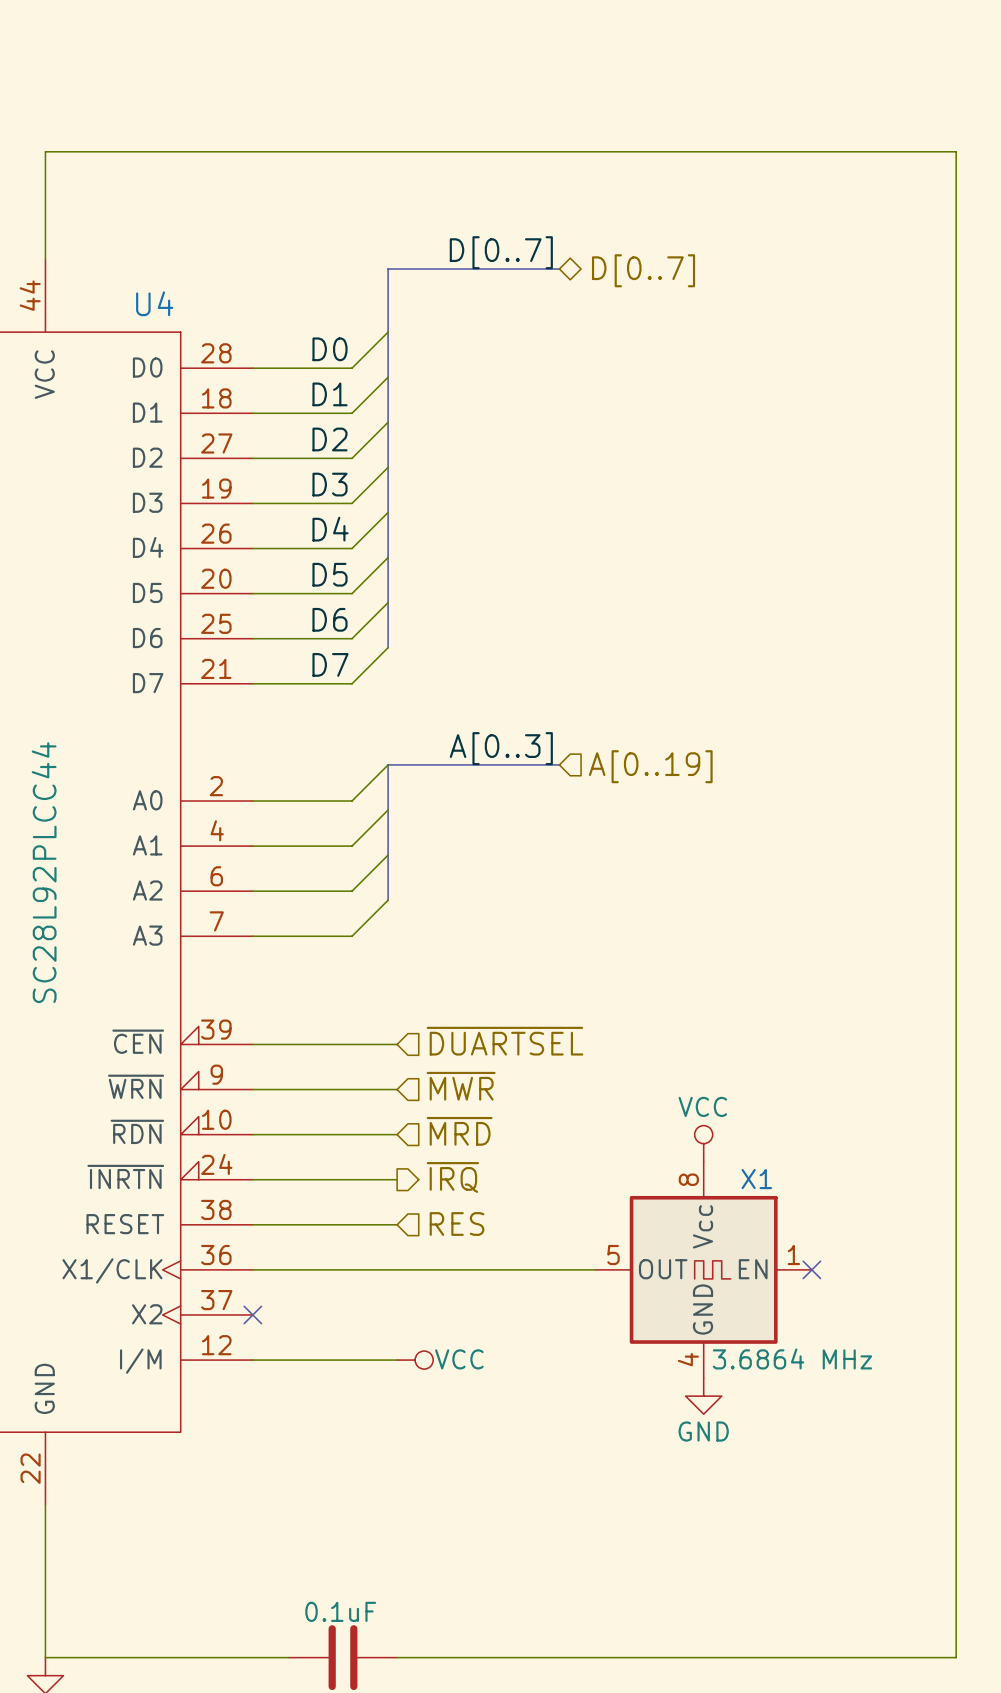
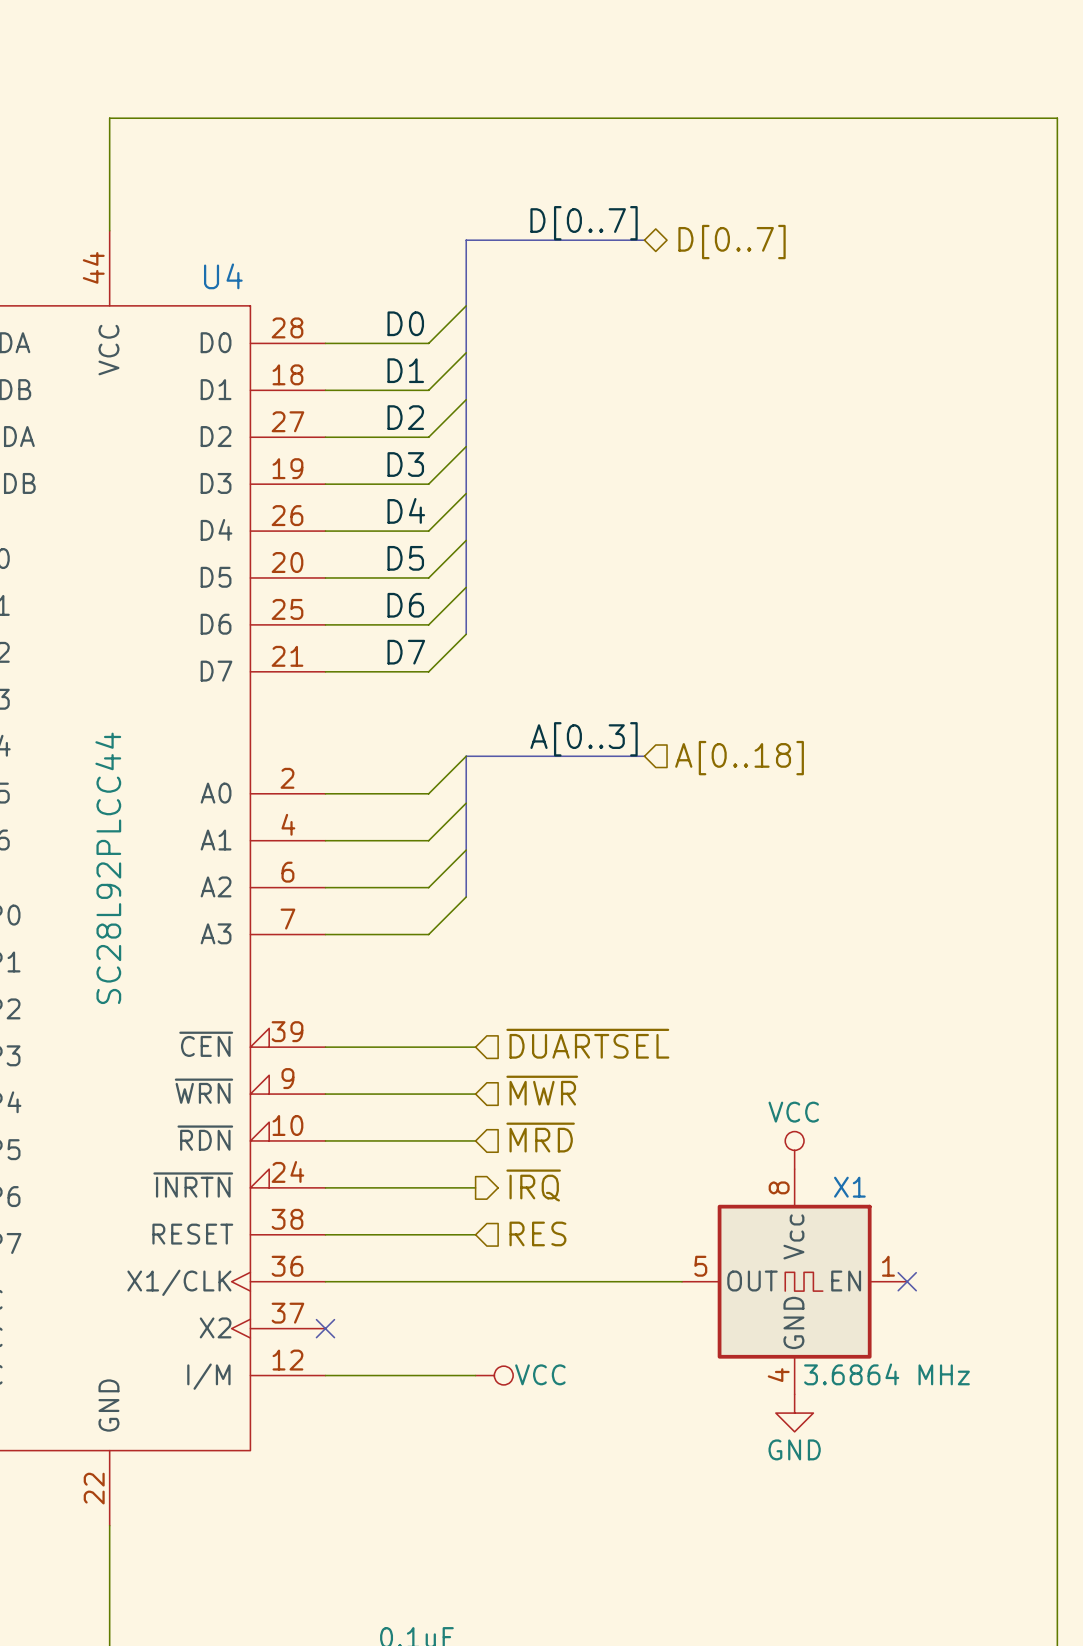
hierarchical label: A[0..19] (650, 766) -> A[0..18] (739, 758)

